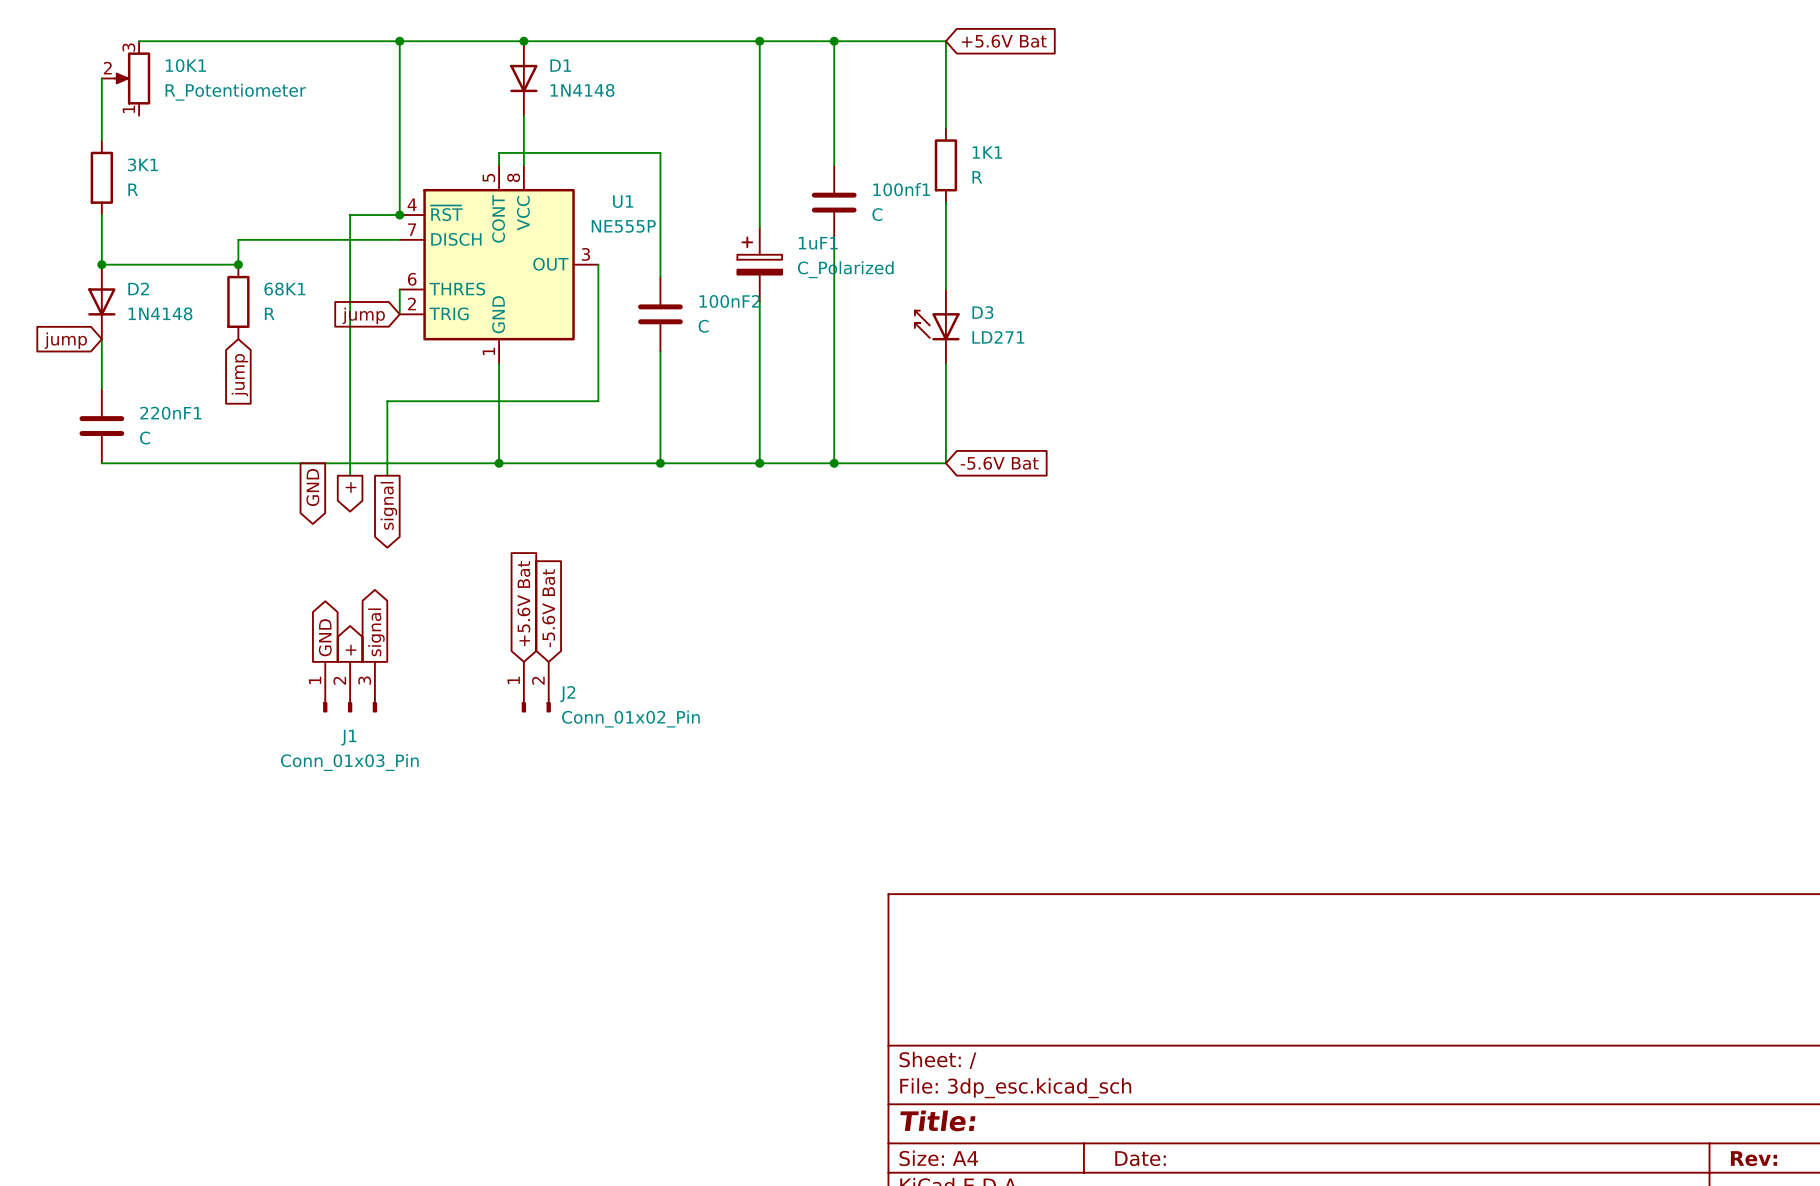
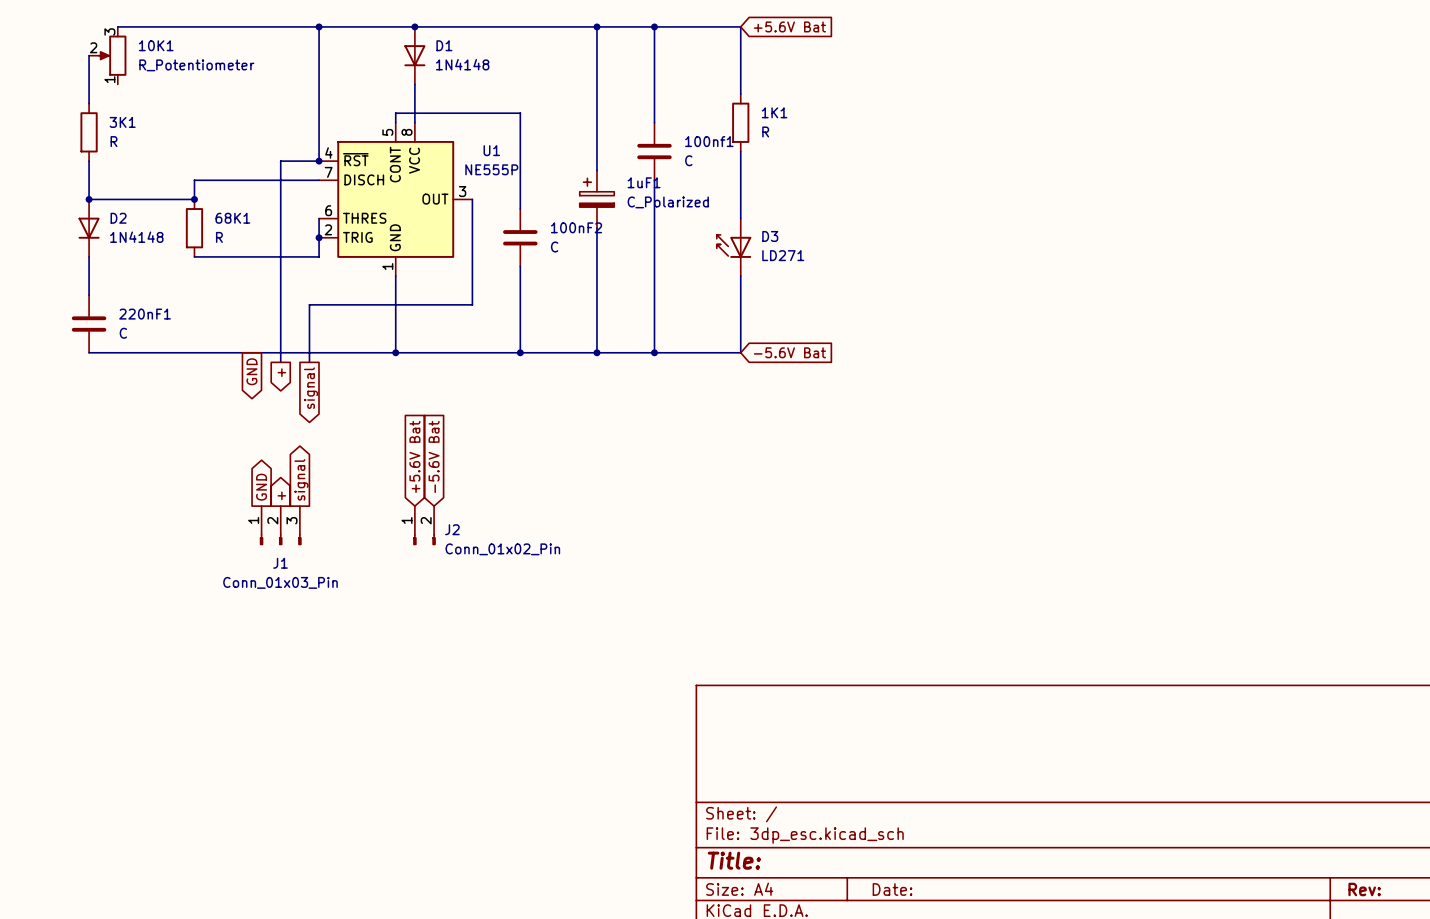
wire: none -> (319, 237) (319, 256) (194, 256)
junction: none -> (319, 237)
global label: jump (363, 315) -> none
global label: jump (65, 340) -> none
global label: jump (239, 375) -> none

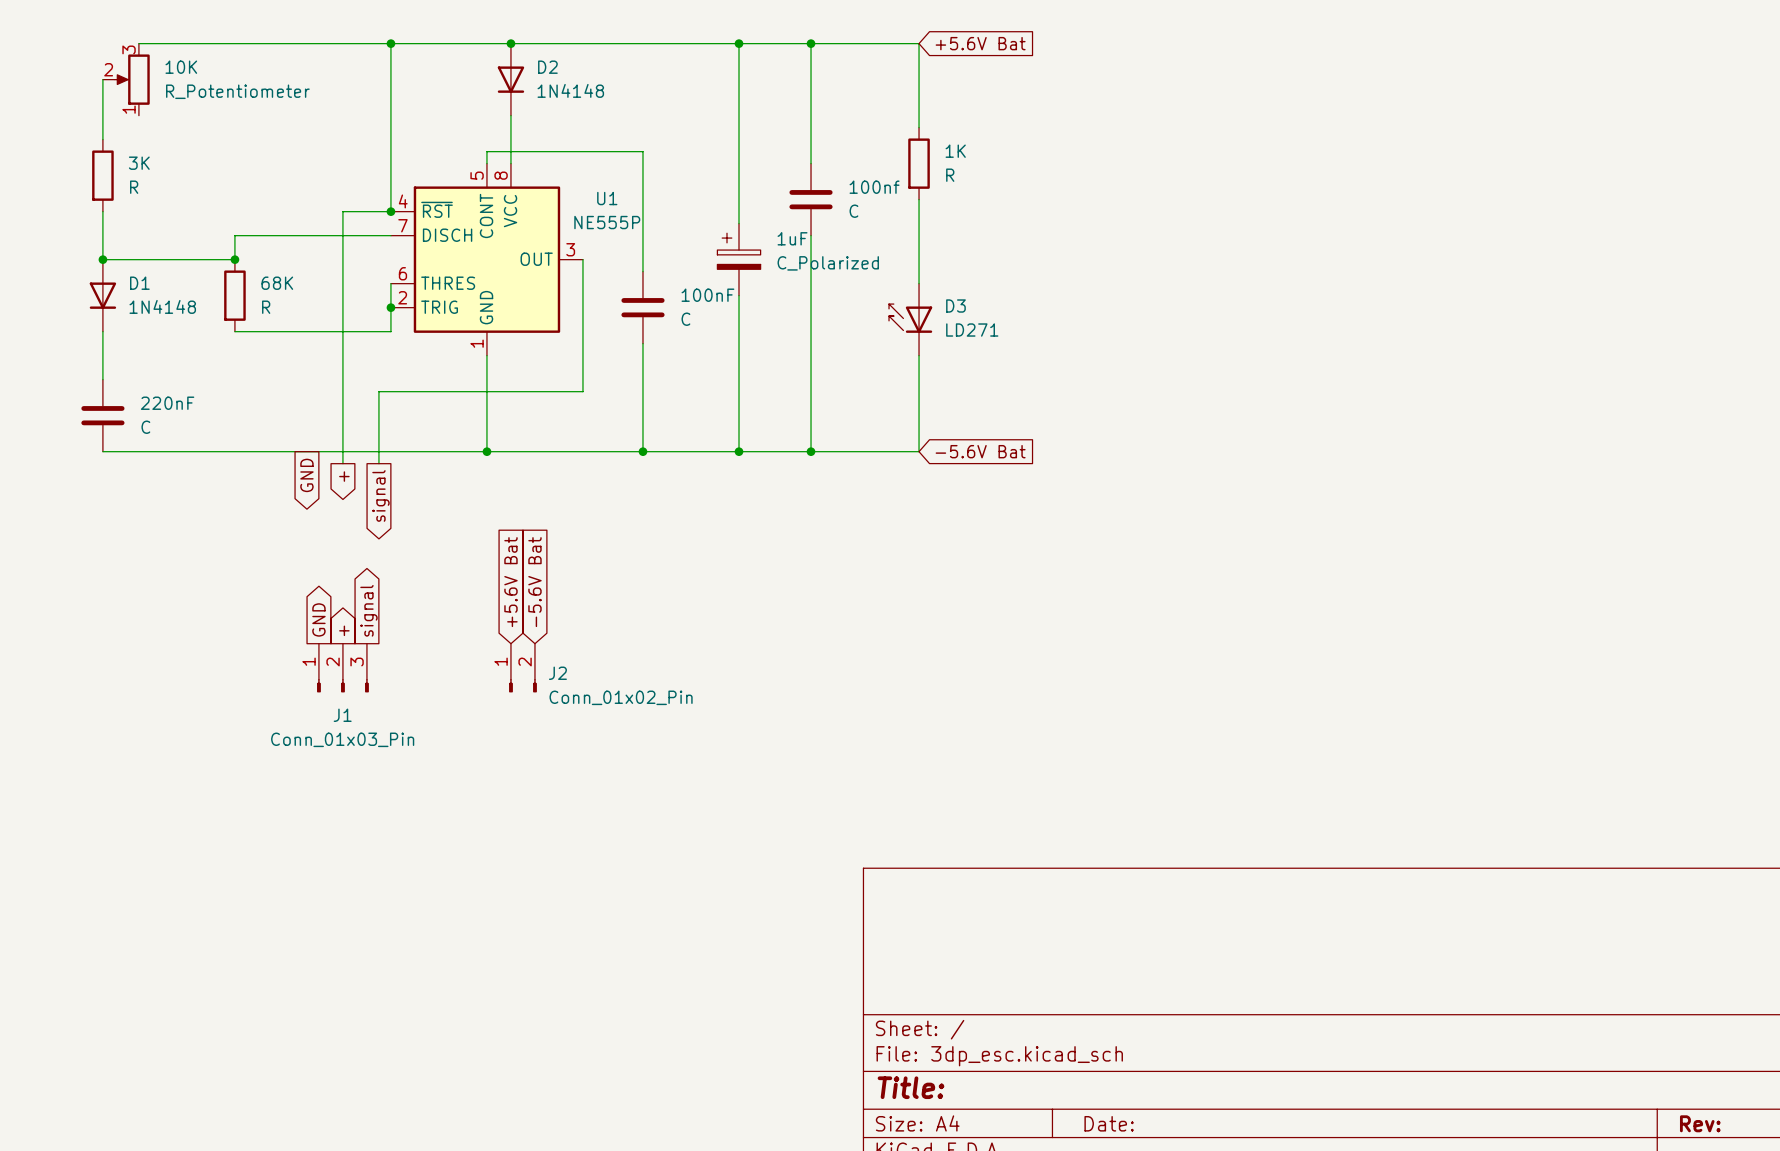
10K1 name: 10K1 (156, 45) -> 10K (181, 67)
D1 name: D1 (444, 45) -> D2 (547, 67)
1K1 name: 1K1 (774, 112) -> 1K (955, 151)
3K1 name: 3K1 (122, 122) -> 3K (139, 163)
100nf1 name: 100nf1 (709, 141) -> 100nf (874, 187)
1uF1 name: 1uF1 (644, 182) -> 1uF (792, 238)
D2 name: D2 (118, 218) -> D1 (139, 283)
68K1 name: 68K1 (232, 218) -> 68K (277, 283)
100nF2 name: 100nF2 (576, 227) -> 100nF (707, 295)
220nF1 name: 220nF1 (145, 314) -> 220nF (167, 403)

